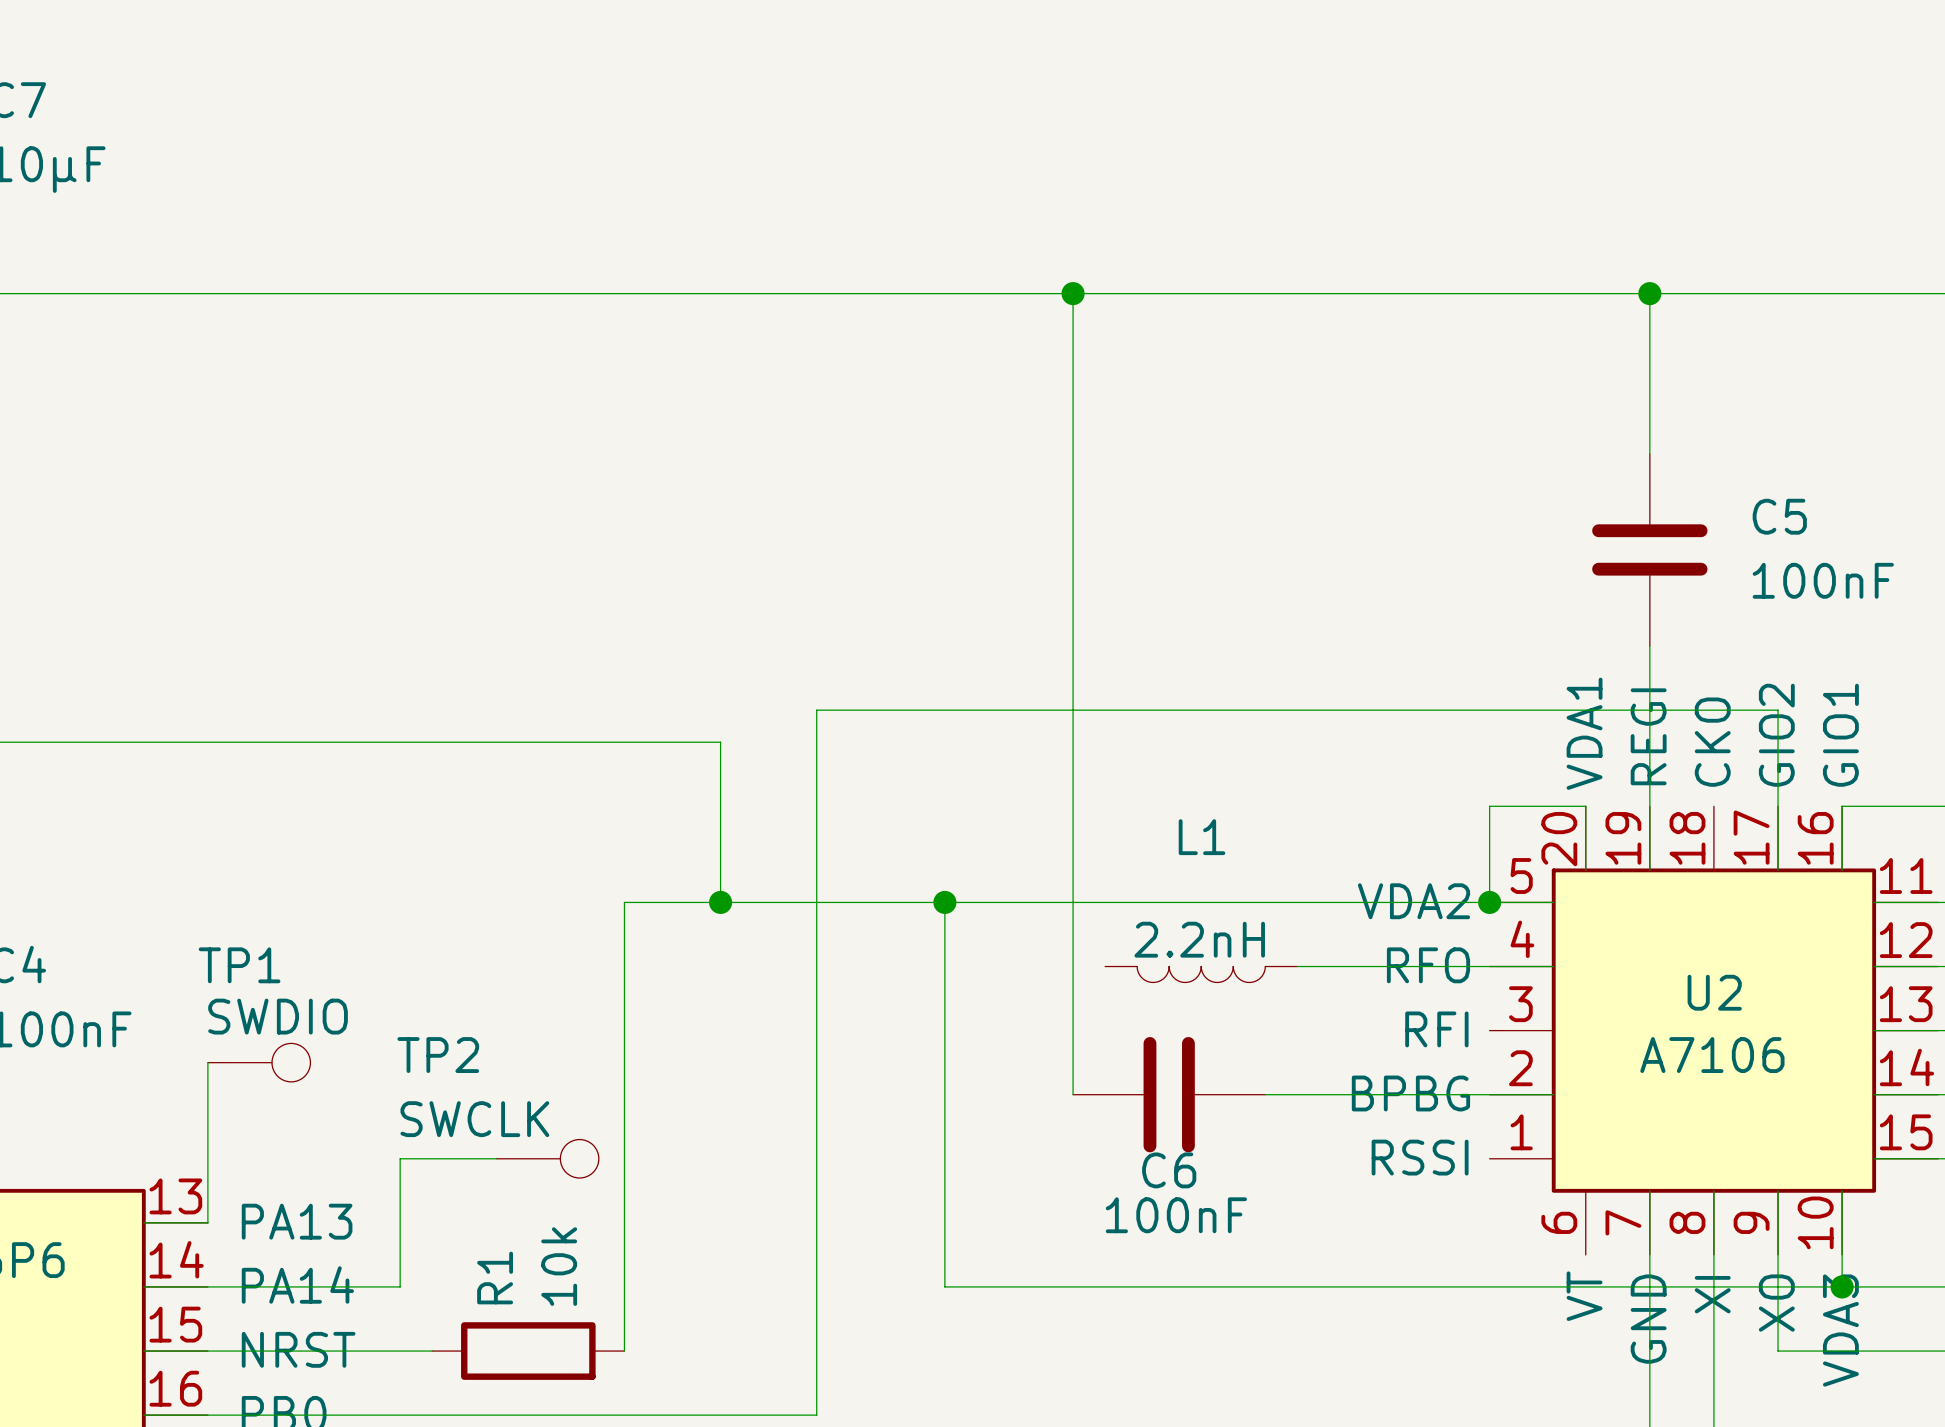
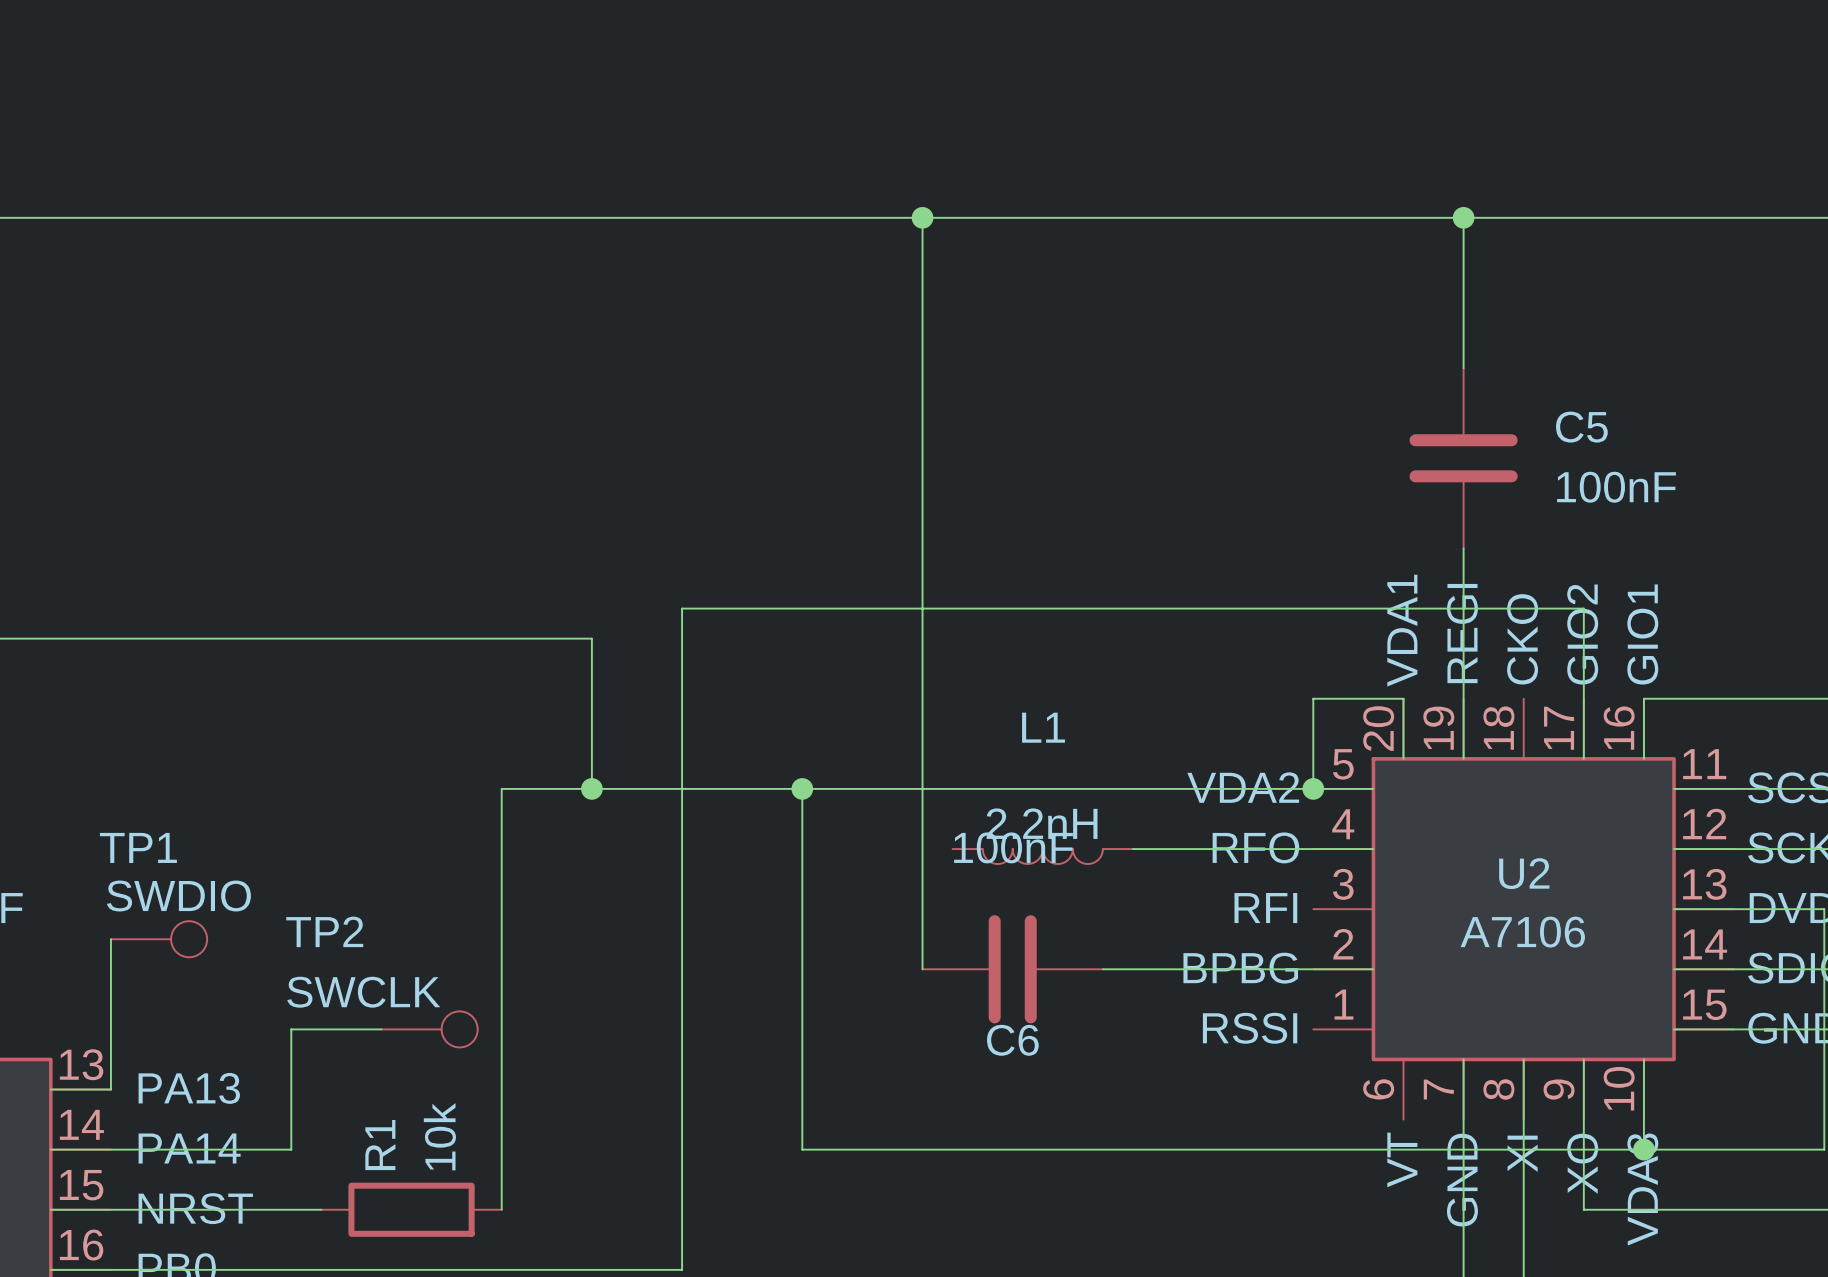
C6 value position: 100nF (1176, 1215) -> 100nF (1013, 847)

